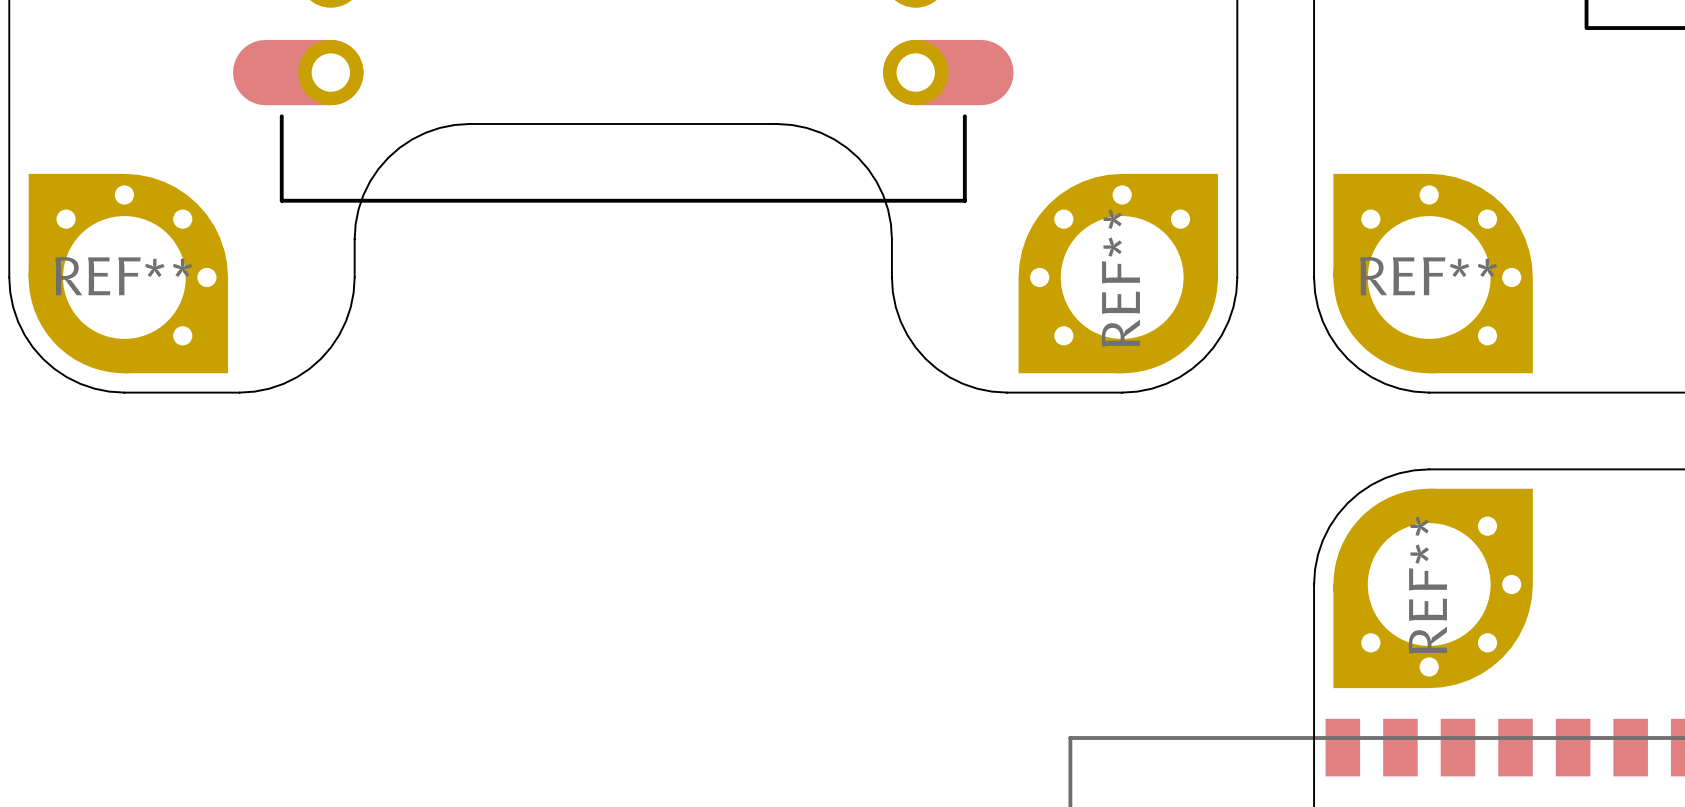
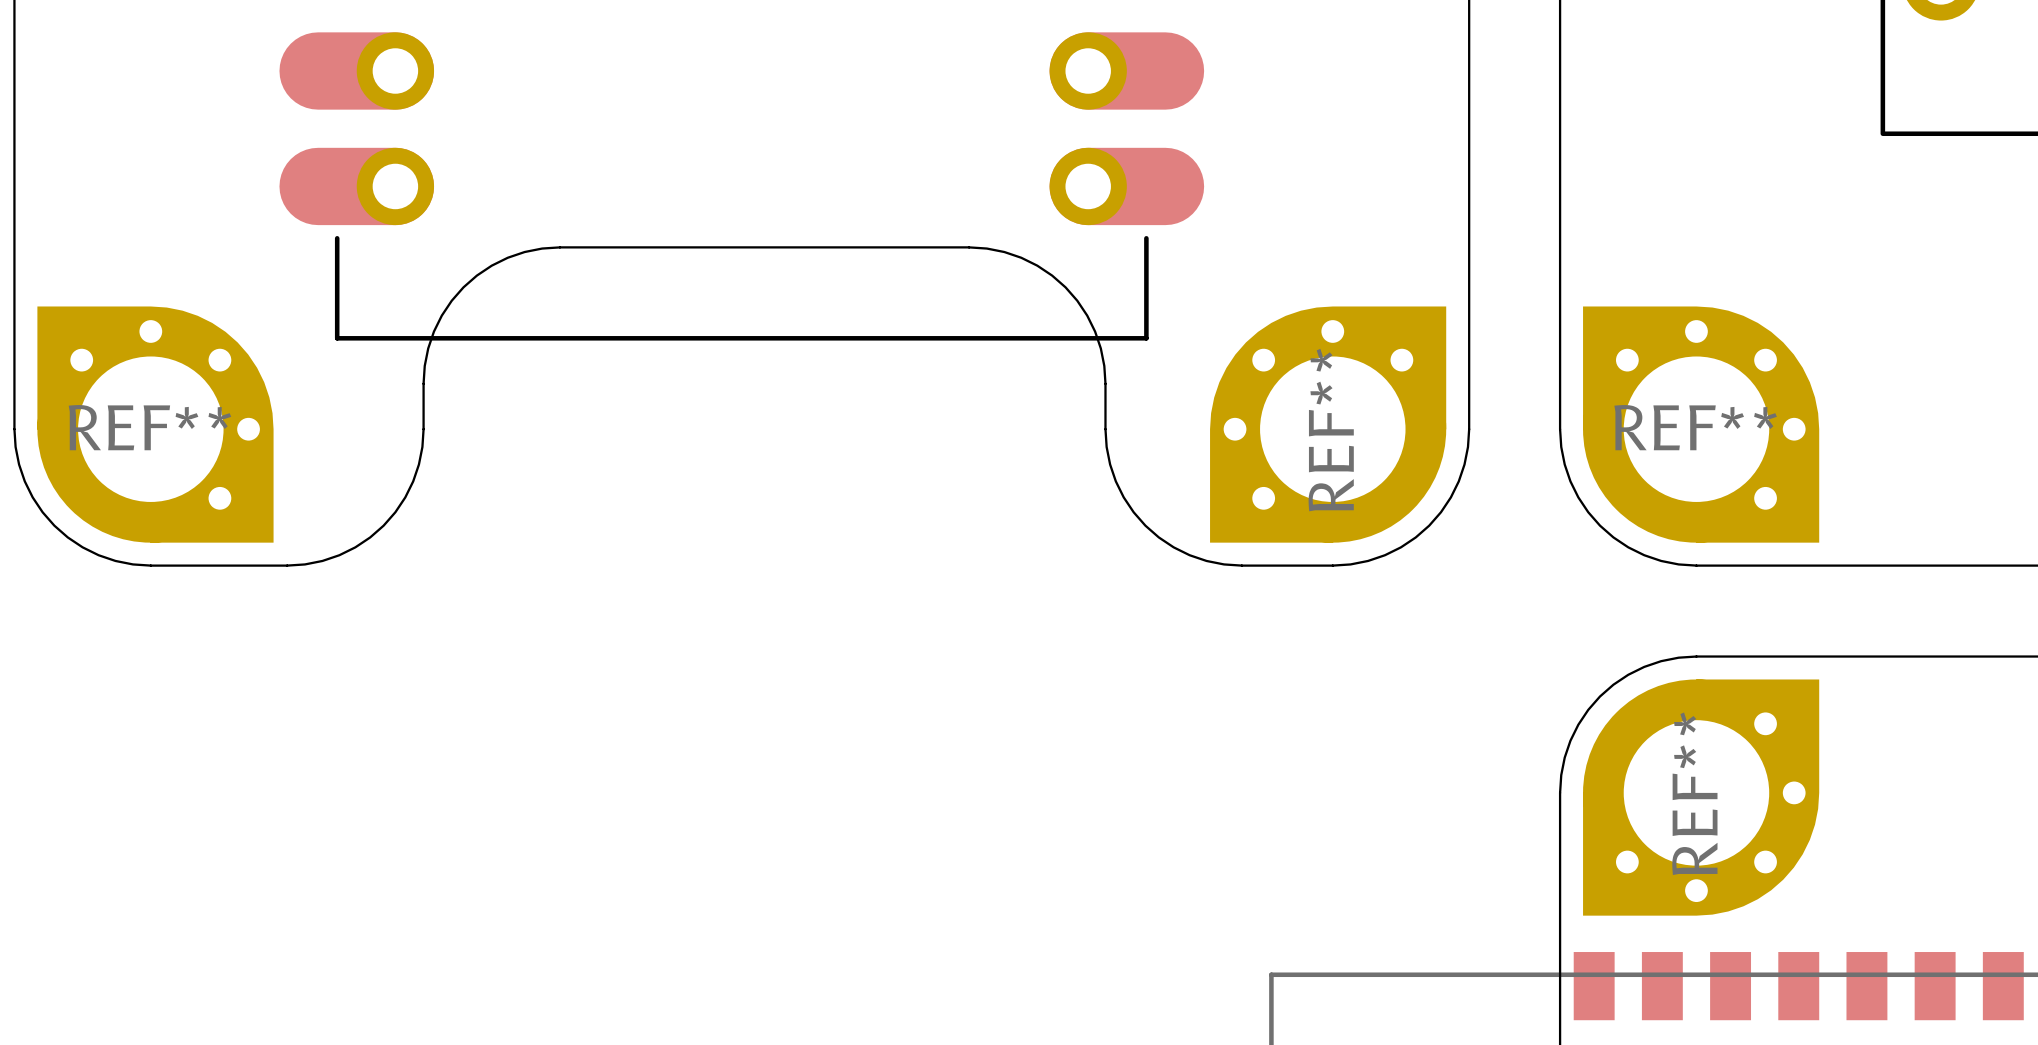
board edge: (776, 123) (806, 127) (834, 139) (858, 157) (876, 181) (883, 195) (890, 224) (891, 277) (895, 307) (907, 335) (925, 358) (949, 377) (977, 388) (1007, 392) (1045, 392) -> (923, 247) (969, 247) (1004, 252) (1037, 265) (1065, 287) (1087, 315) (1100, 348) (1105, 383) (1106, 447) (1110, 464) (1123, 497) (1145, 525) (1173, 547) (1206, 560) (1241, 565)

